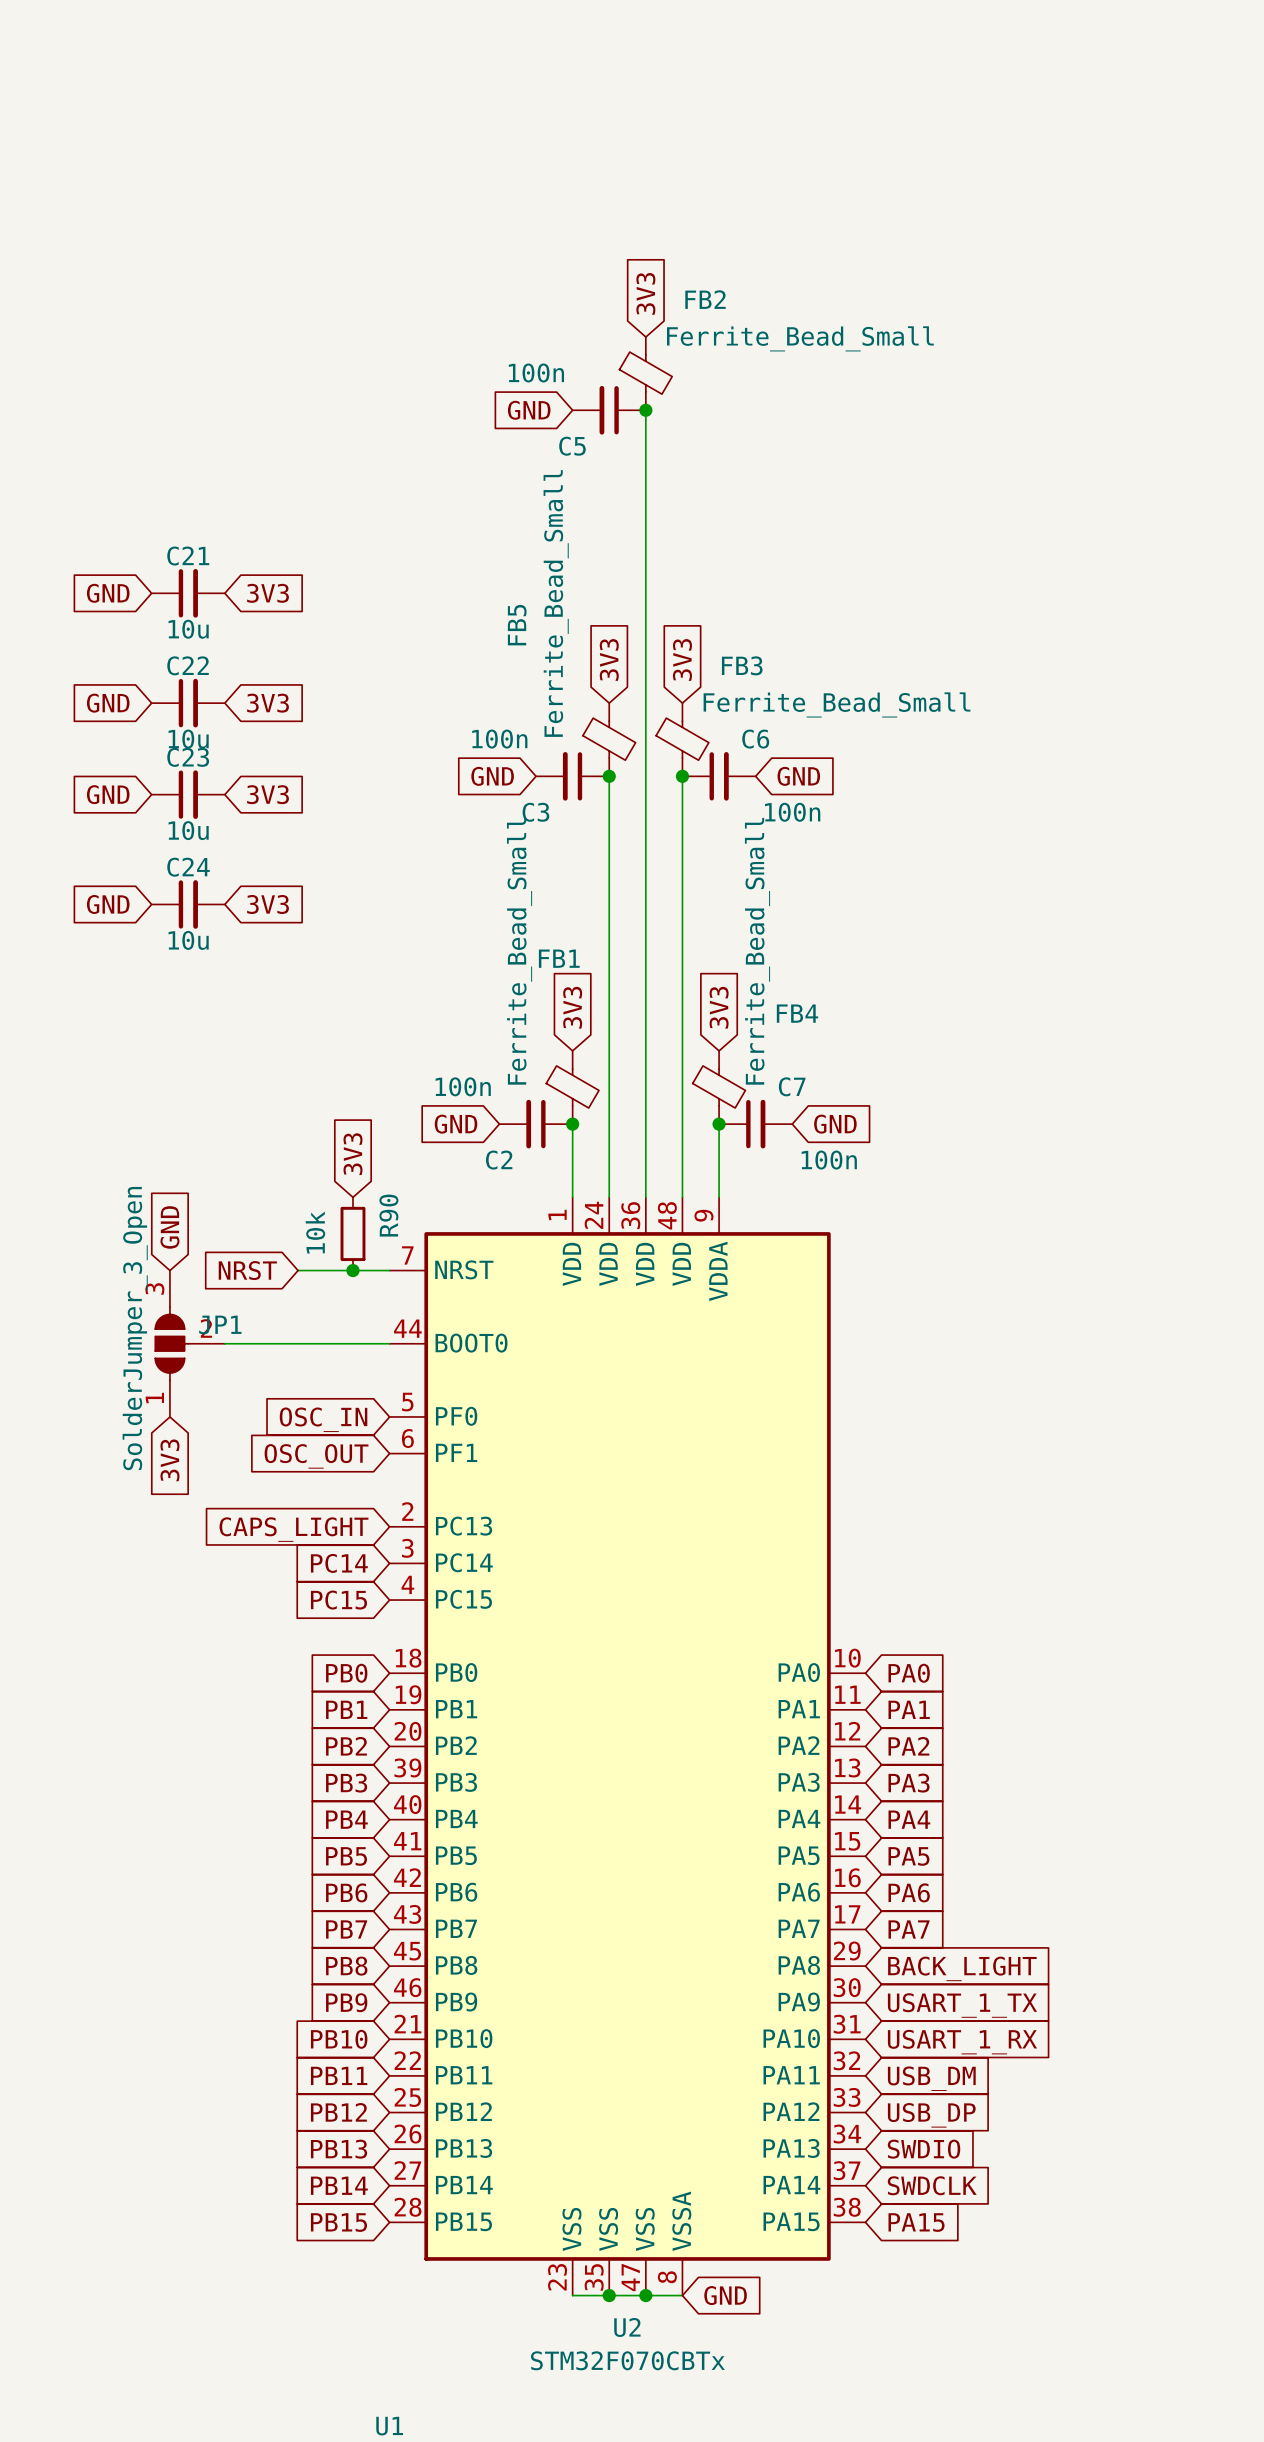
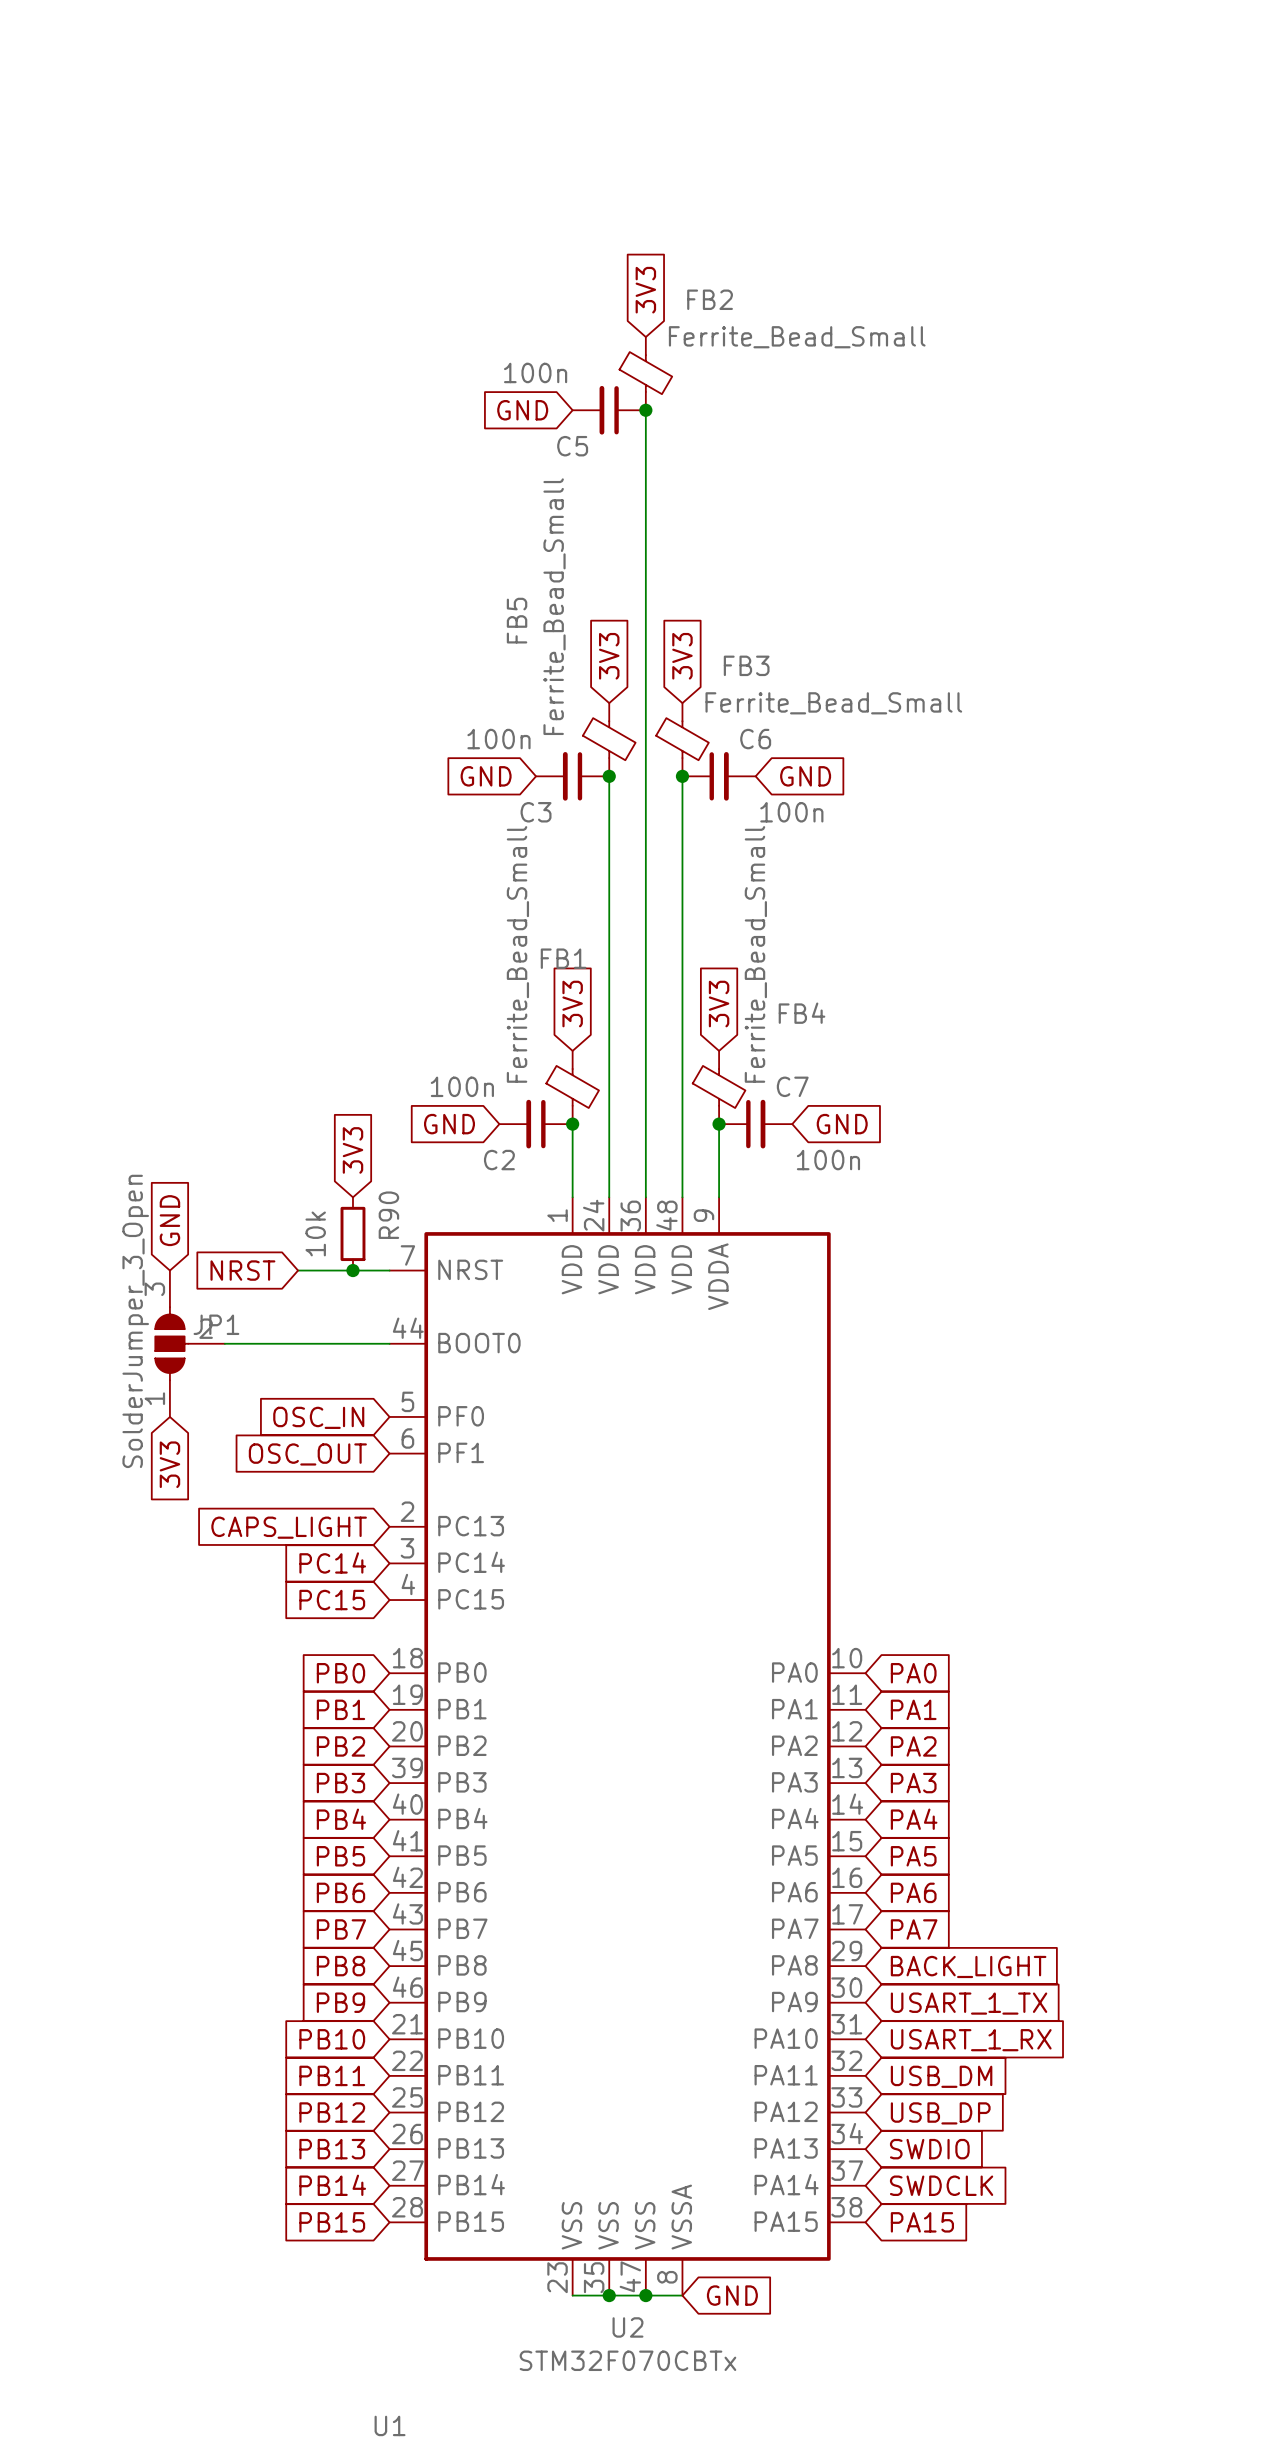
global label: GND (108, 593) -> none
C21: 10u (188, 593) -> none
global label: 3V3 (268, 593) -> none
global label: GND (108, 703) -> none
C22: 10u (188, 703) -> none
global label: 3V3 (268, 703) -> none
global label: GND (108, 794) -> none
C23: 10u (188, 794) -> none
global label: 3V3 (268, 794) -> none
global label: GND (108, 904) -> none
C24: 10u (188, 904) -> none
global label: 3V3 (268, 904) -> none

